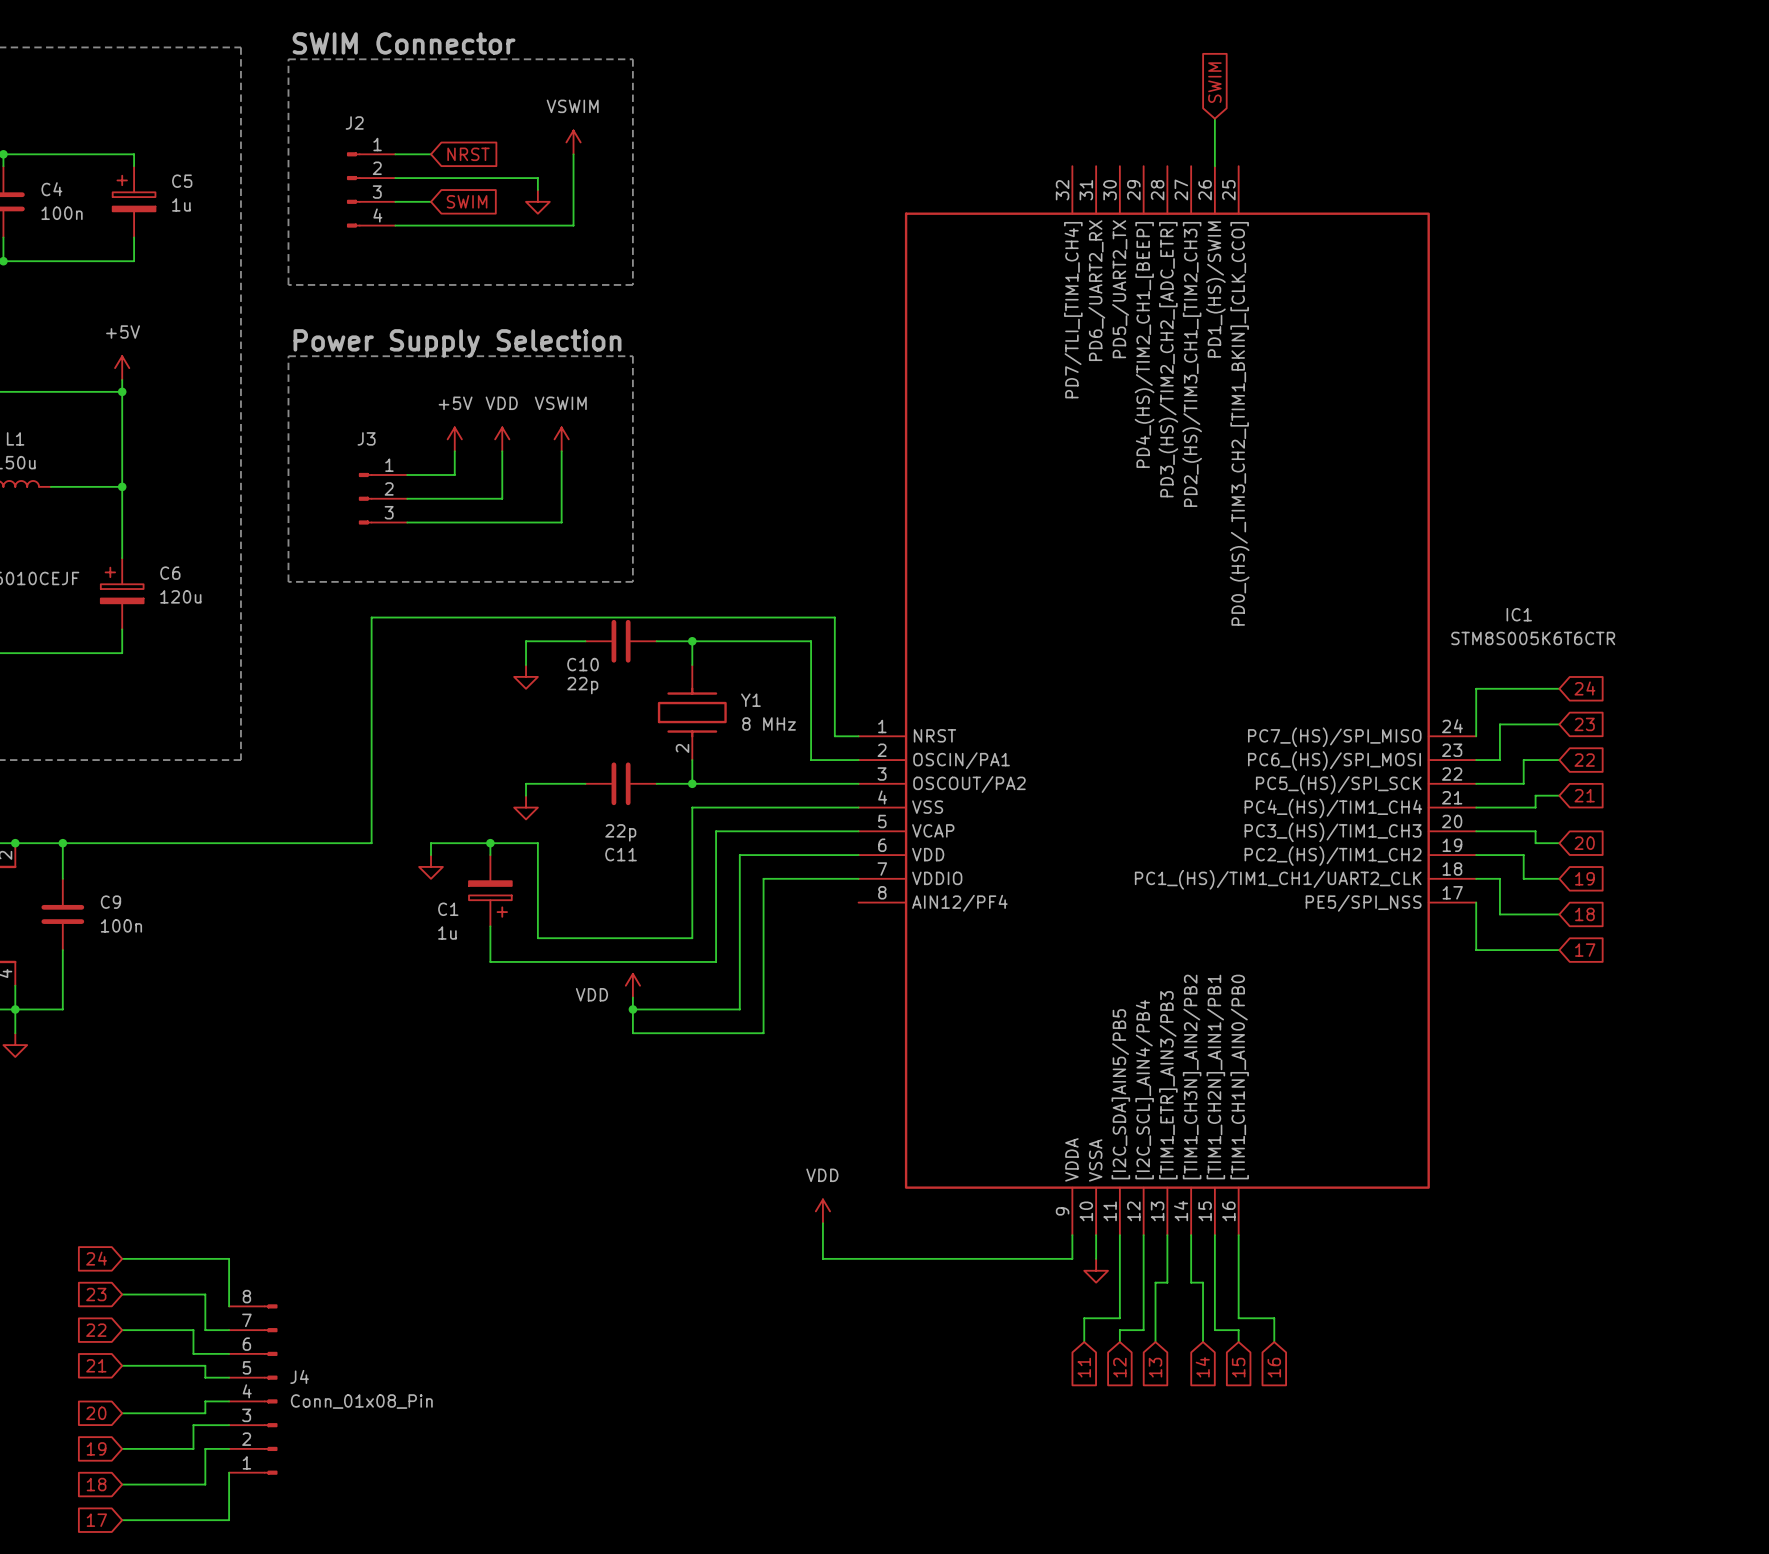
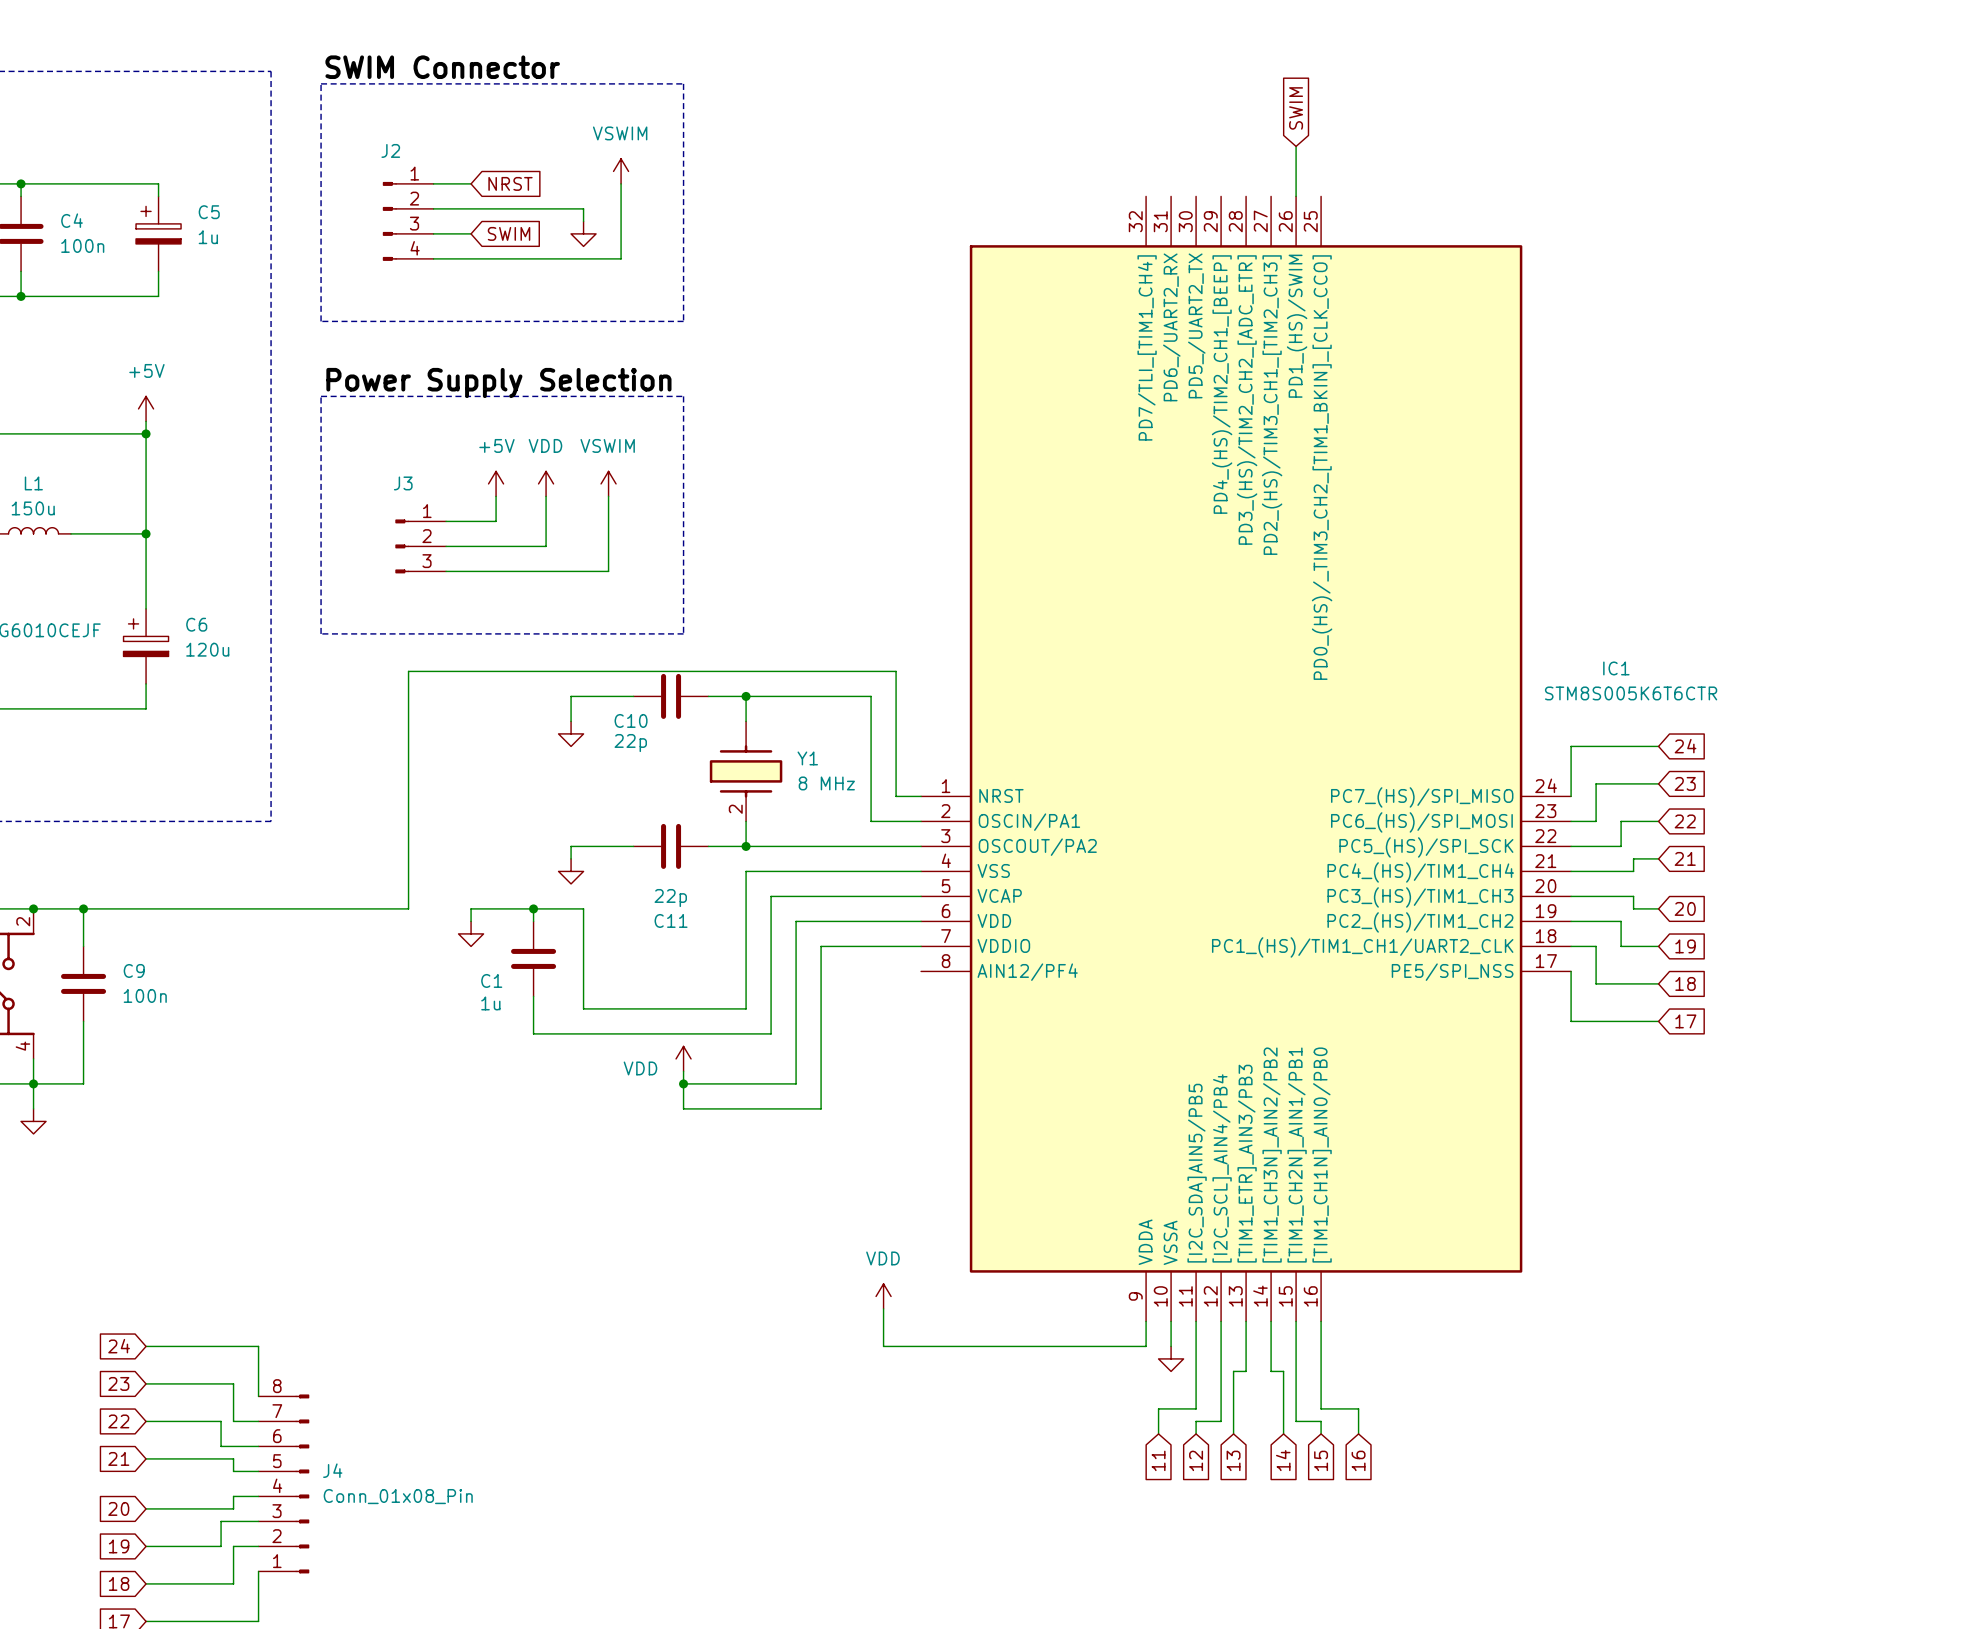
C1 symbol: [469, 855, 512, 927] -> [511, 921, 557, 997]

